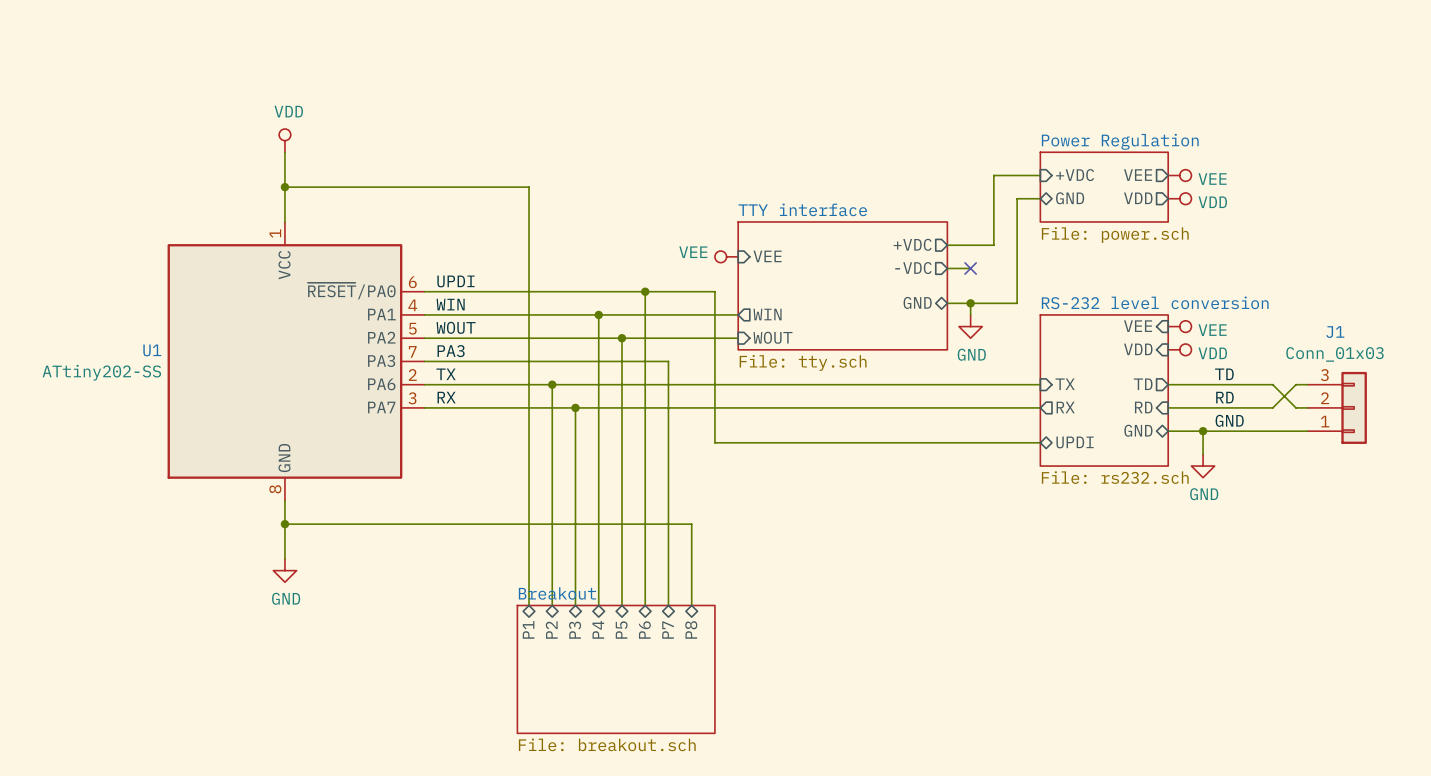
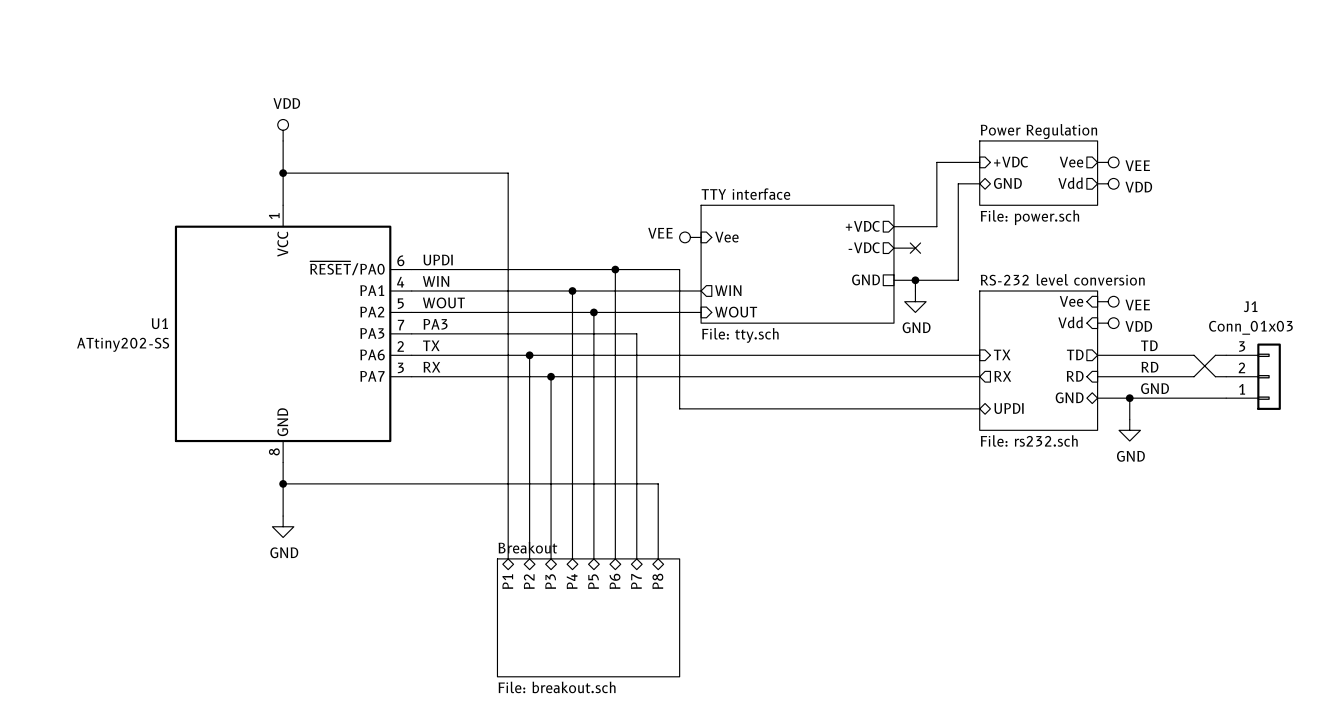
sheet pin: VEE (1138, 175) -> Vee (1071, 162)
sheet pin: VDD (1138, 198) -> Vdd (1070, 183)
sheet pin: VEE (767, 256) -> Vee (726, 237)
sheet pin shape: bidirectional (917, 302) -> passive (866, 279)
sheet pin: VEE (1138, 326) -> Vee (1071, 301)
sheet pin: VDD (1138, 349) -> Vdd (1070, 322)

